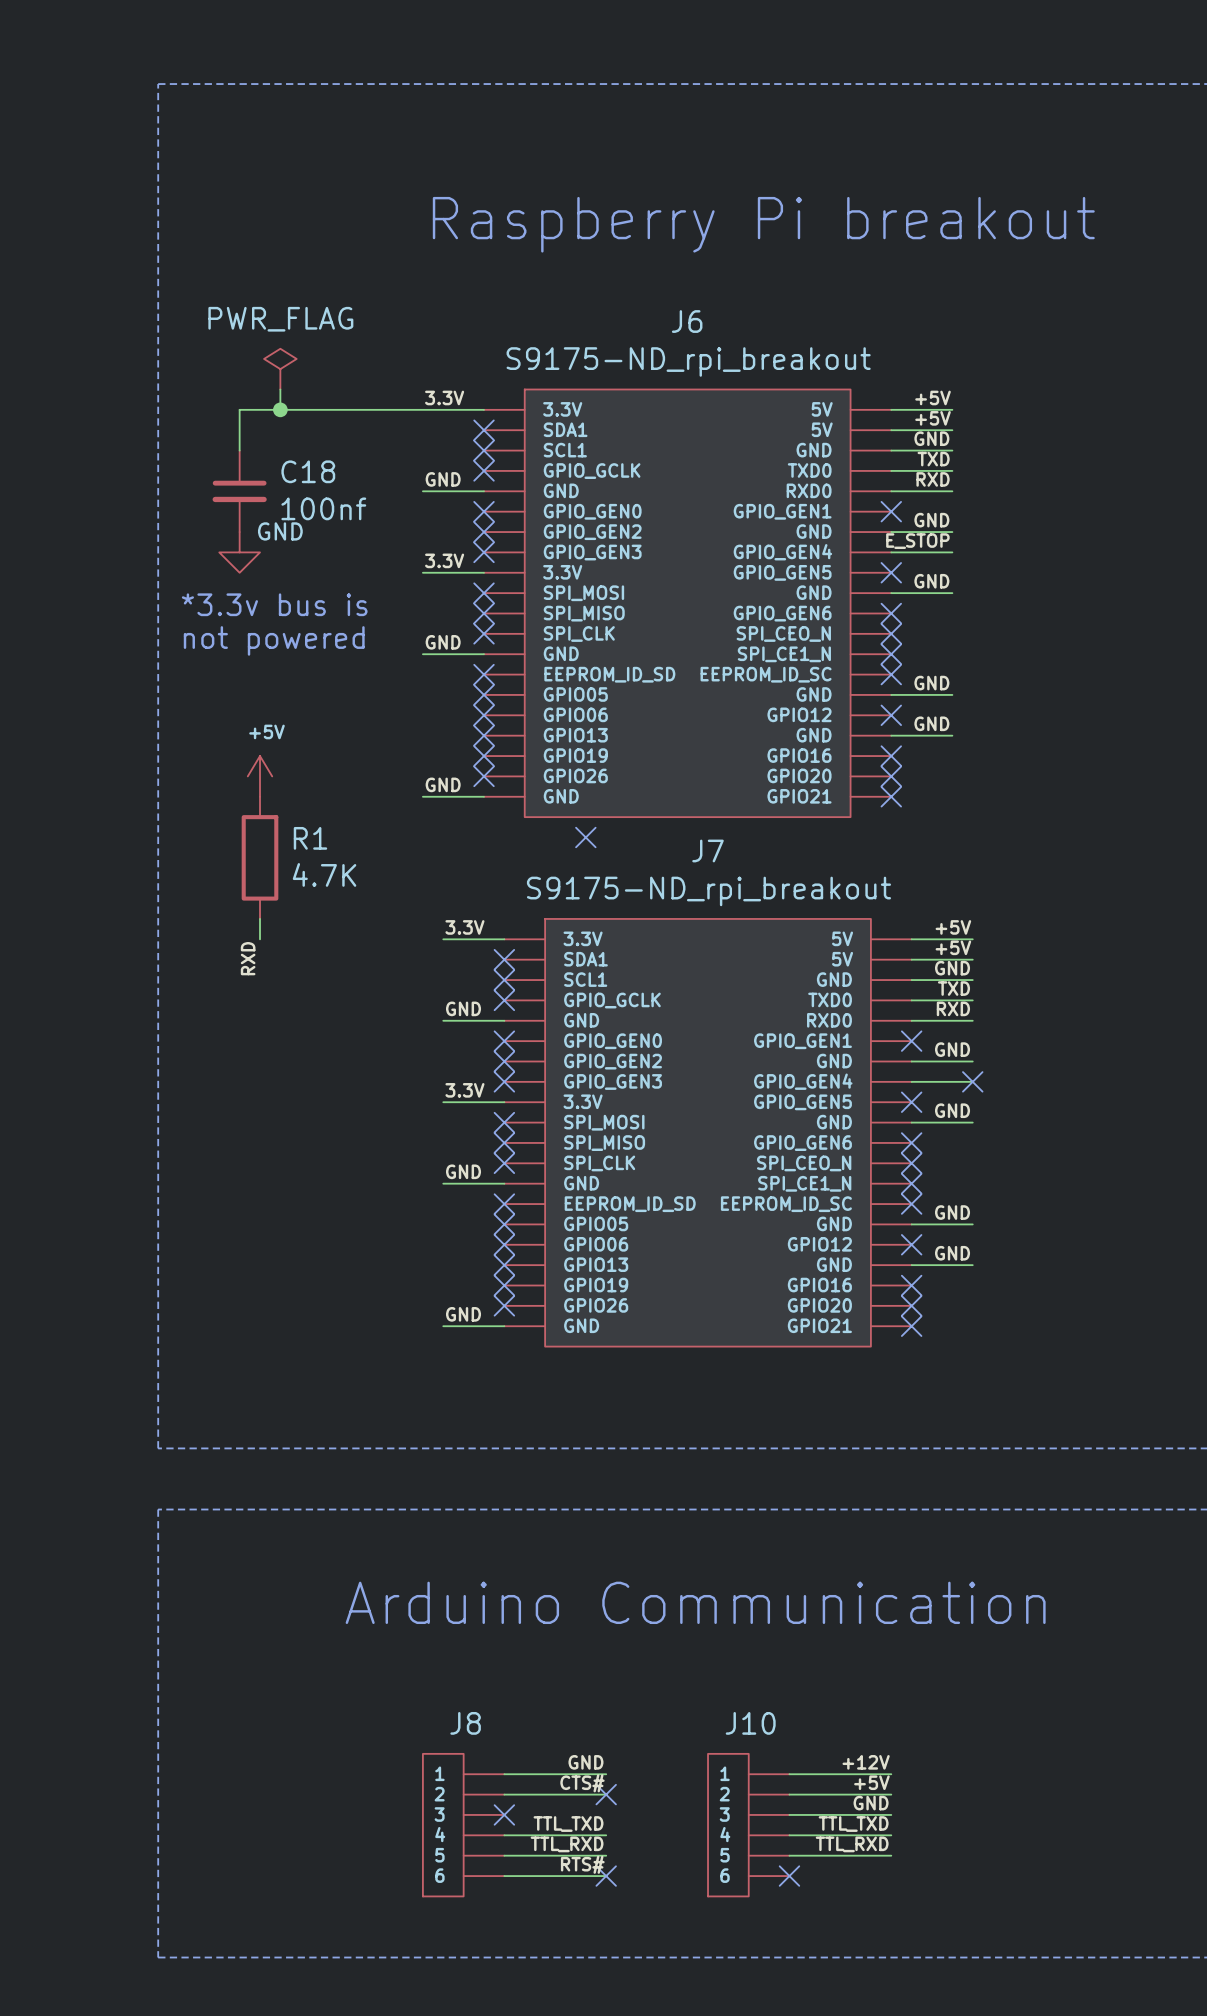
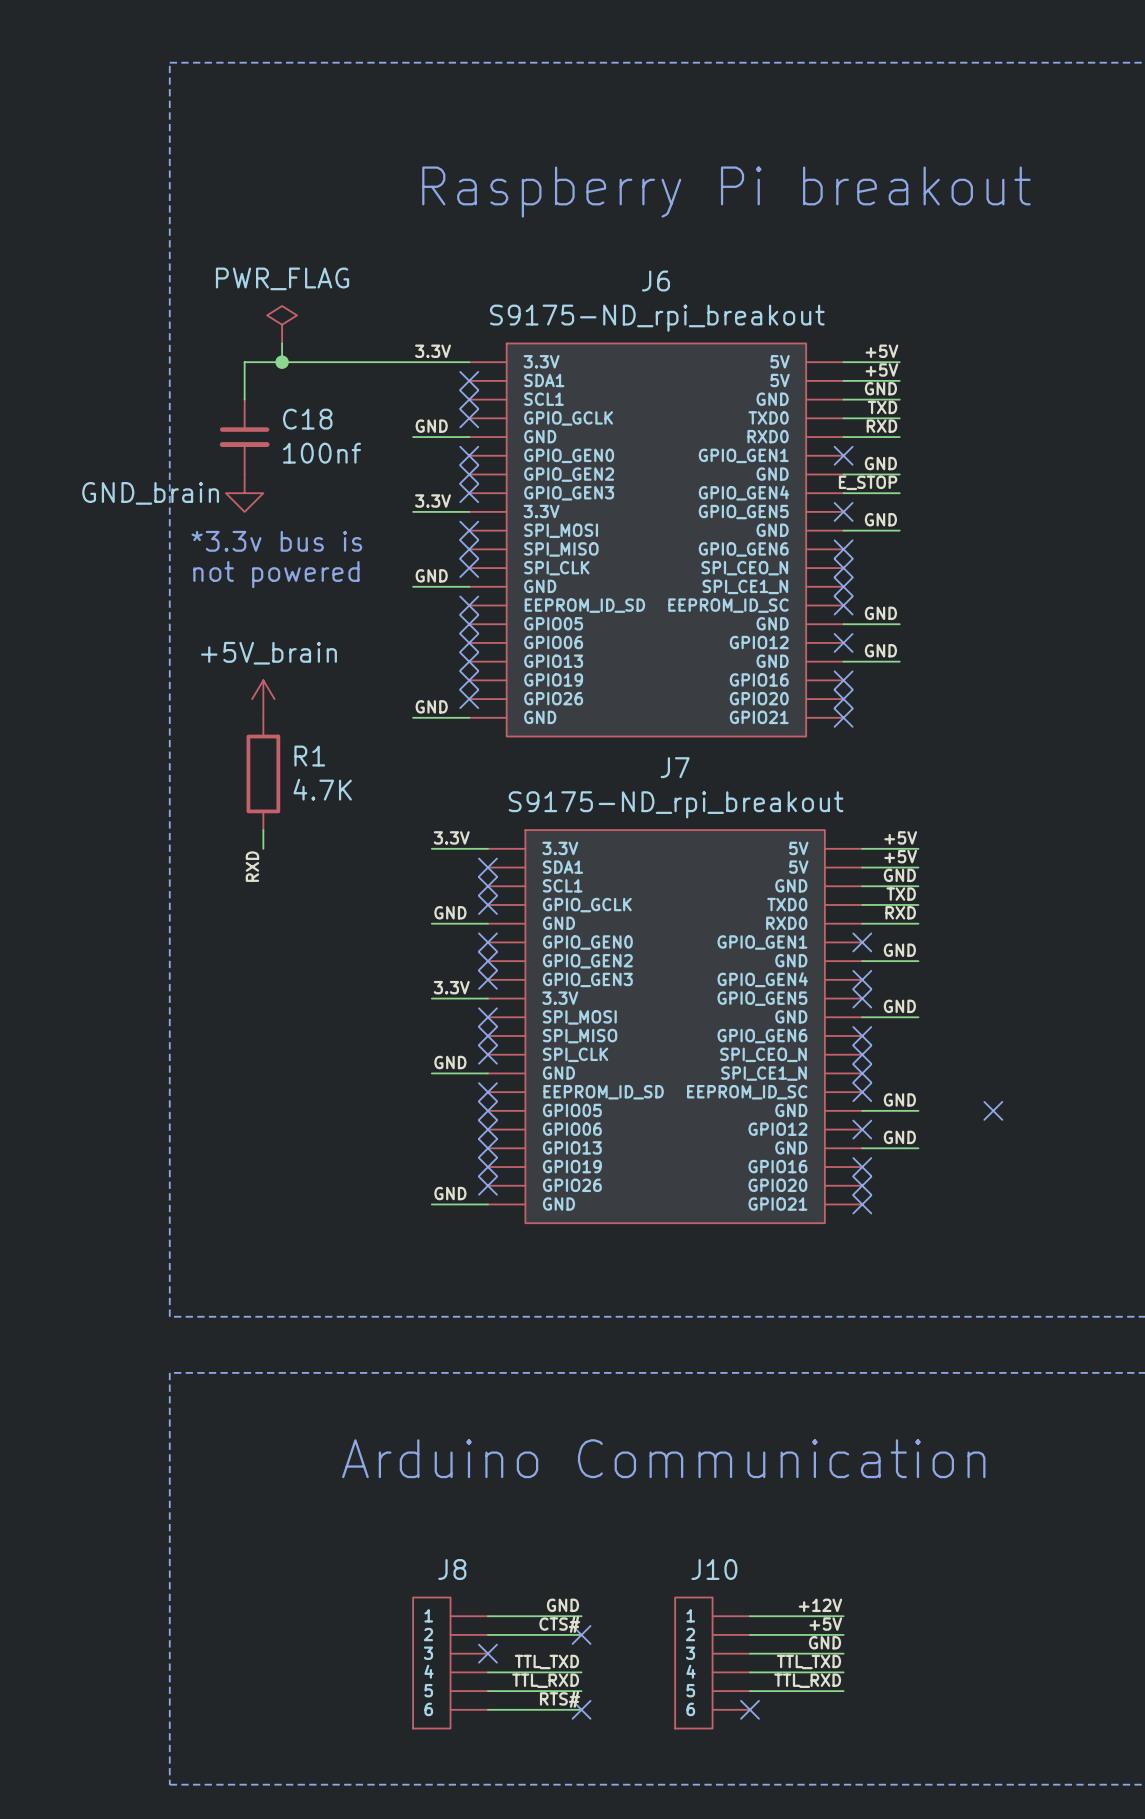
power symbol: GND (239, 552) -> GND_brain (244, 493)
power symbol: +5V (260, 776) -> +5V_brain (263, 699)
no-connect mark: (585, 837) -> none
wire: (911, 1081) (972, 1081) -> none
no-connect mark position: (972, 1081) -> (862, 979)
no-connect mark: none -> (993, 1110)

